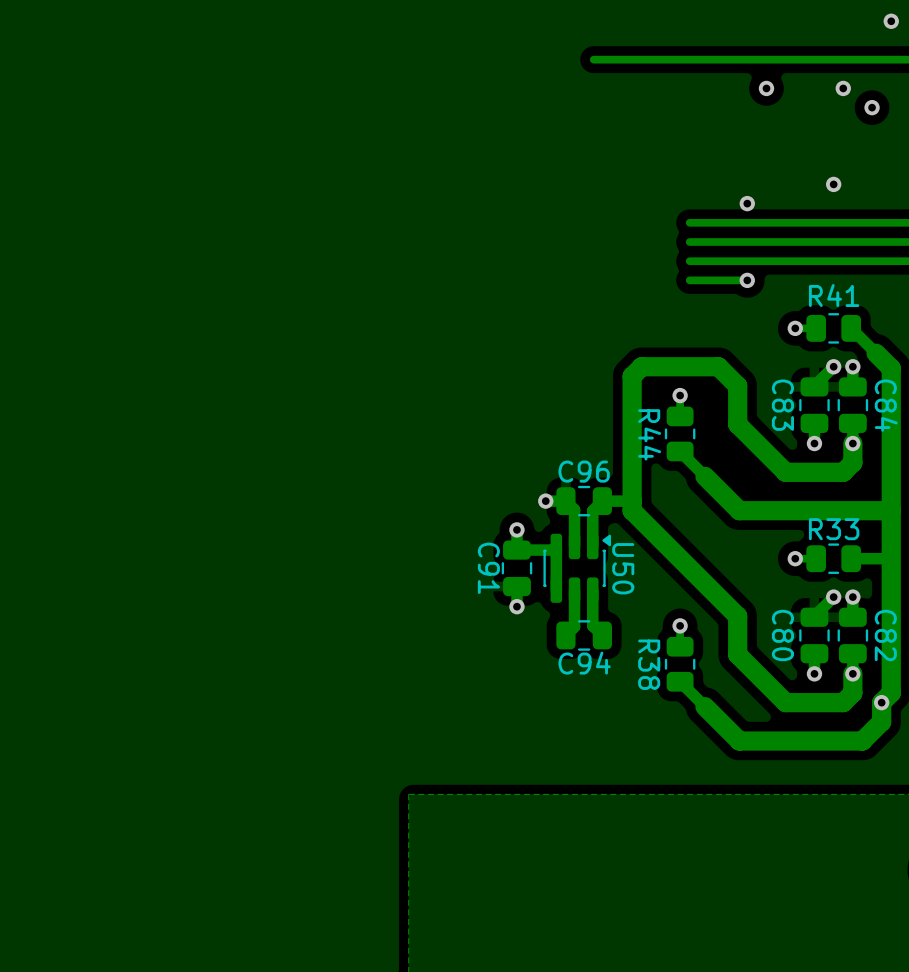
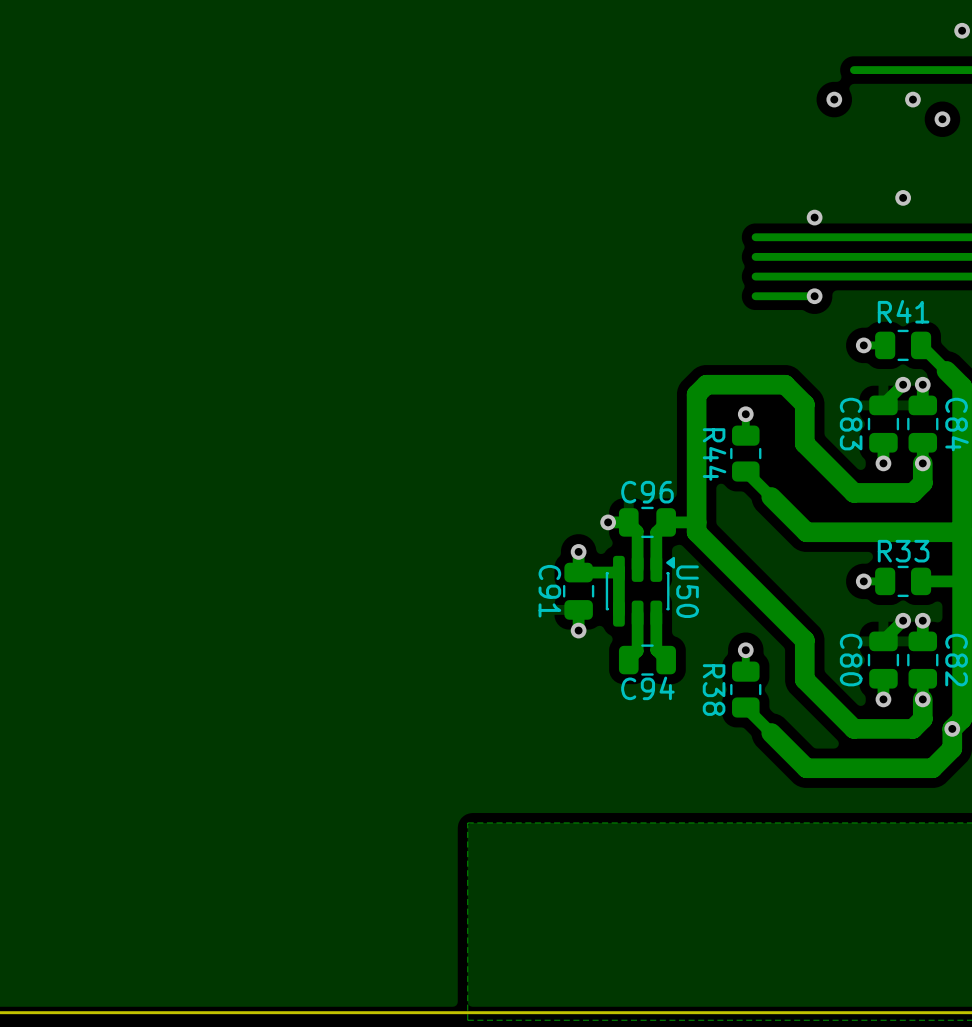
track: (785, 59) (593, 59) -> none

